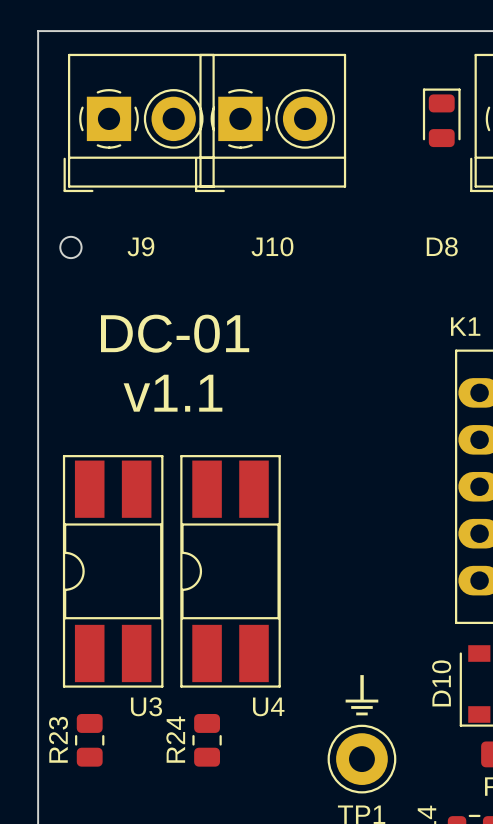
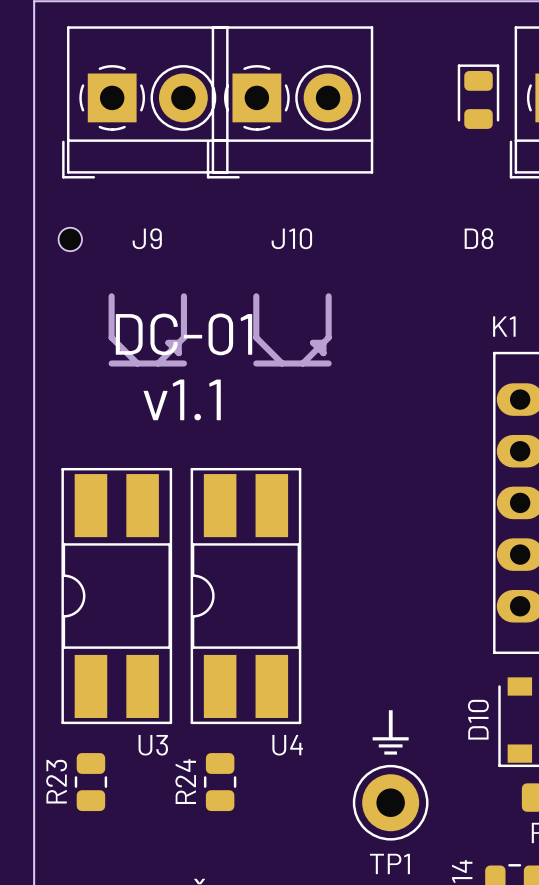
line: none -> (111, 296) (111, 337) (137, 363)
line: none -> (183, 296) (183, 337) (158, 363)
line: none -> (256, 296) (256, 337) (282, 363)
line: none -> (328, 296) (328, 337) (302, 363)
line: none -> (168, 342) (178, 353) (178, 342) (168, 342)
line: none -> (313, 342) (323, 353) (323, 342) (313, 342)
line: none -> (111, 363) (183, 363)
line: none -> (256, 363) (328, 363)

